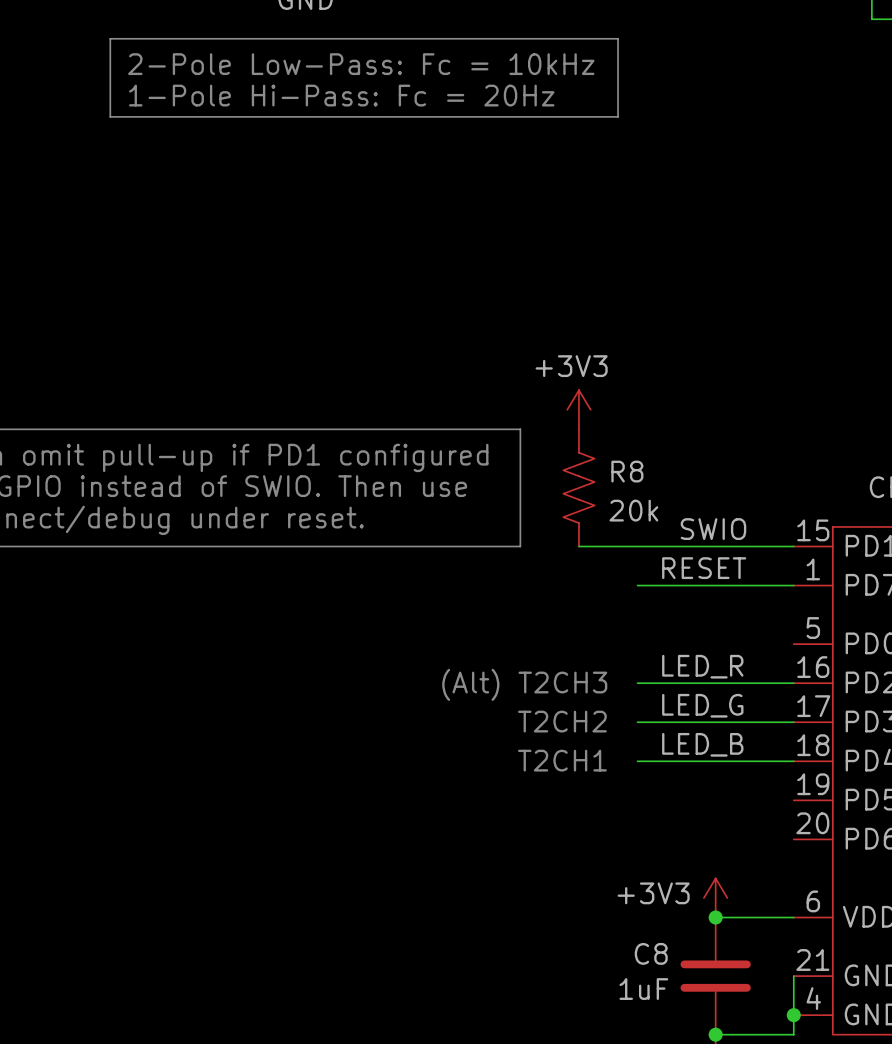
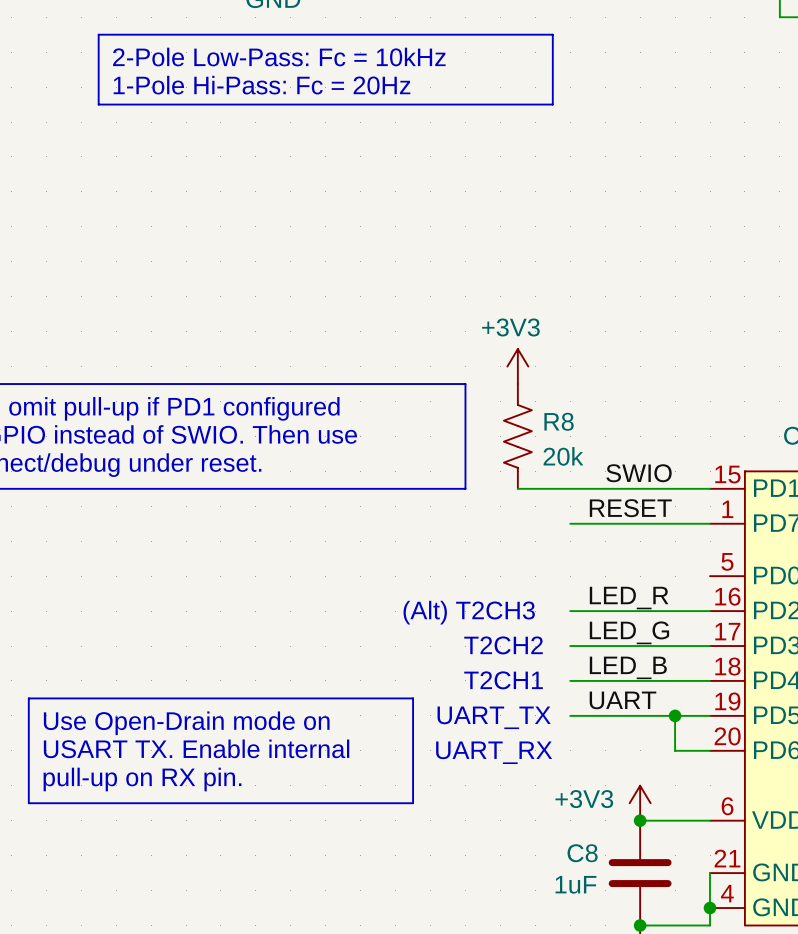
line: none -> (28, 698) (413, 698) (413, 803) (28, 803) (28, 698)
label: none -> UART (622, 700)
text: none -> UART_TX (494, 717)
wire: none -> (570, 715) (710, 715)
wire: none -> (675, 715) (675, 750) (710, 750)
junction: none -> (675, 715)
text: none -> Use Open-Drain mode on (186, 723)
text: none -> USART TX. Enable internal (196, 748)
text: none -> UART_RX (494, 752)
text: none -> pull-up on RX pin. (142, 779)

